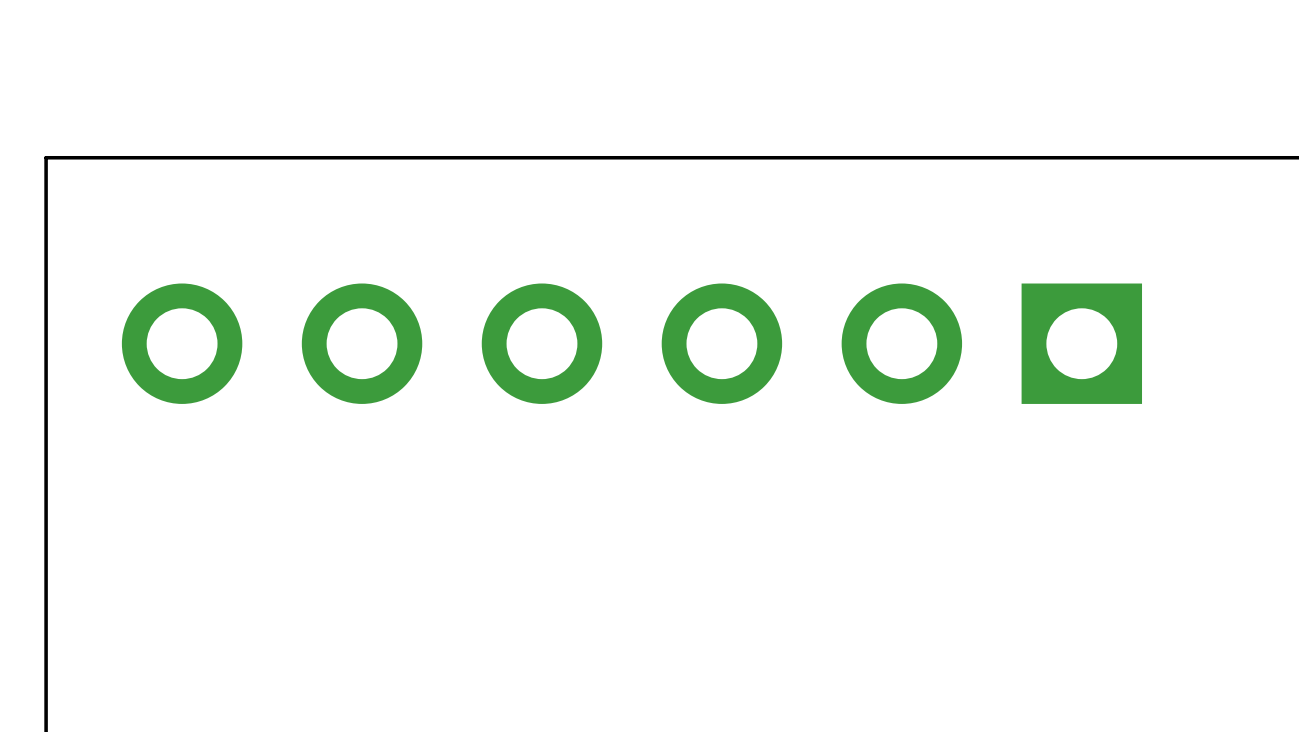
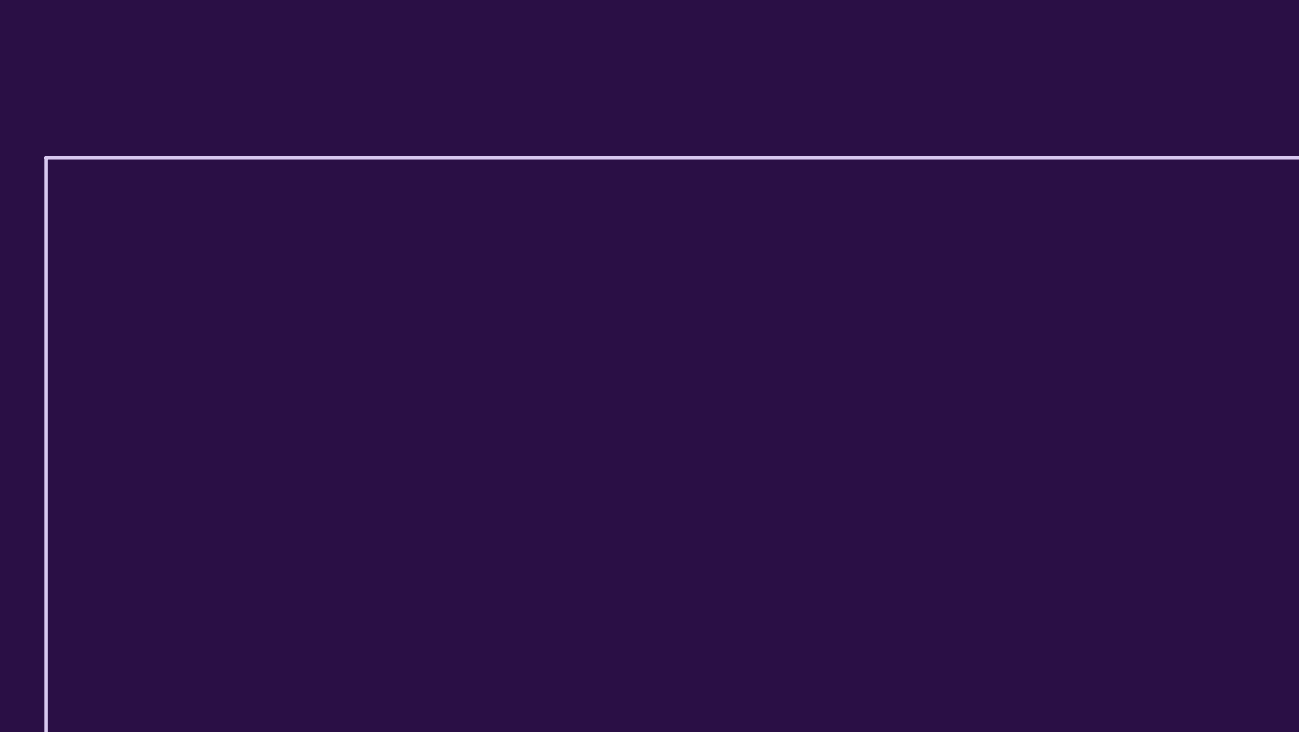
part: (631, 343) -> none

